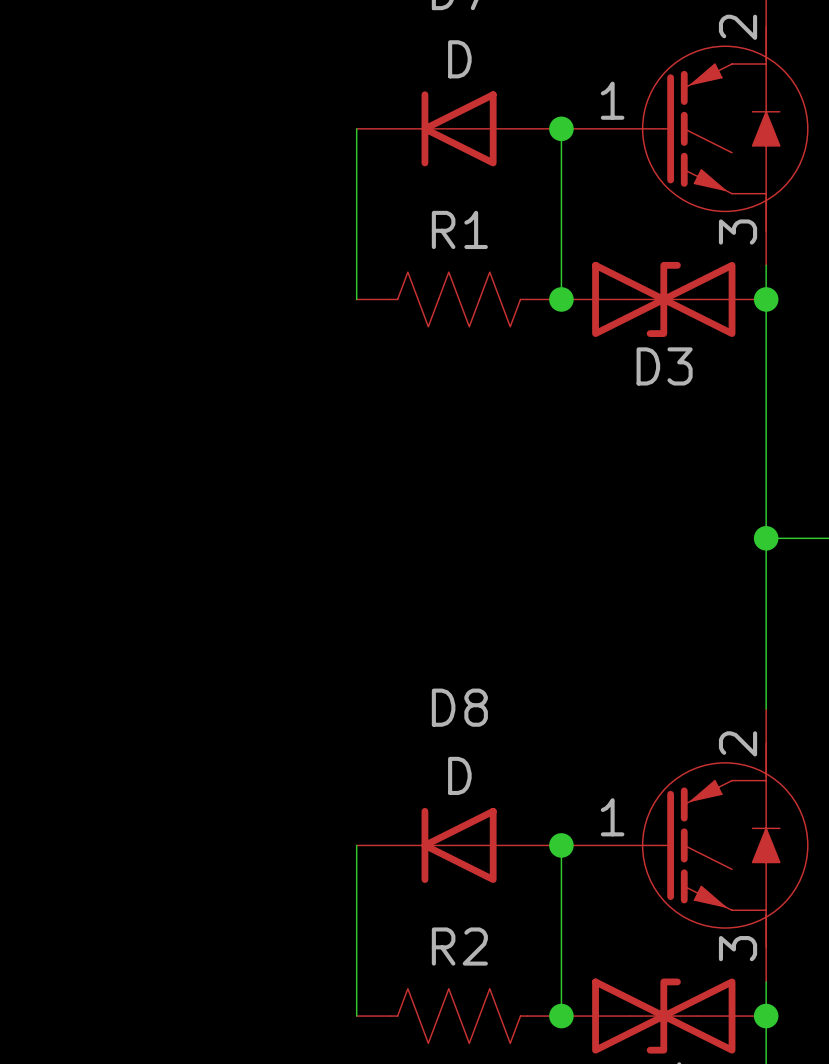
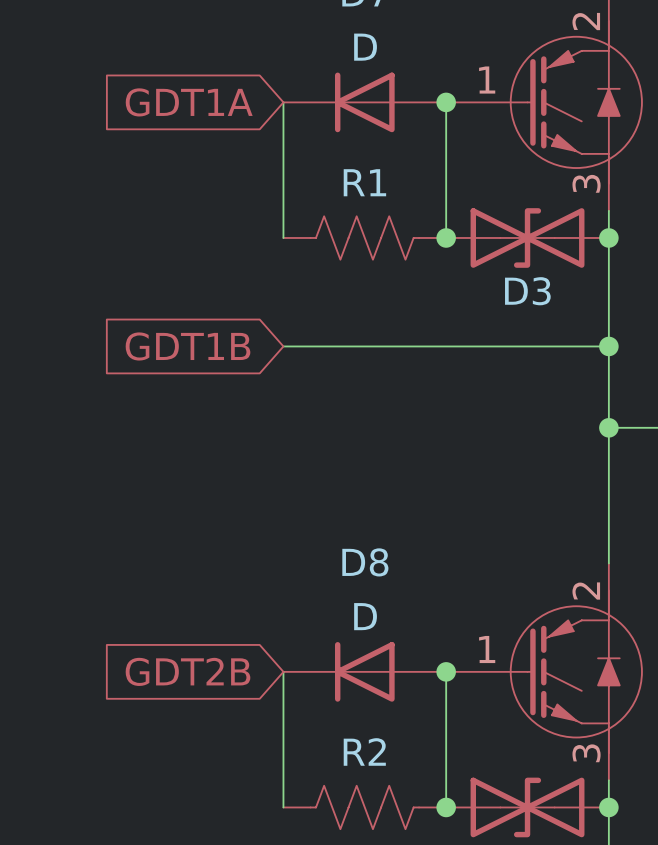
global label: none -> GDT1A (189, 102)
global label: none -> GDT1B (187, 346)
wire: none -> (283, 346) (608, 346)
junction: none -> (608, 346)
global label: none -> GDT2B (187, 671)

